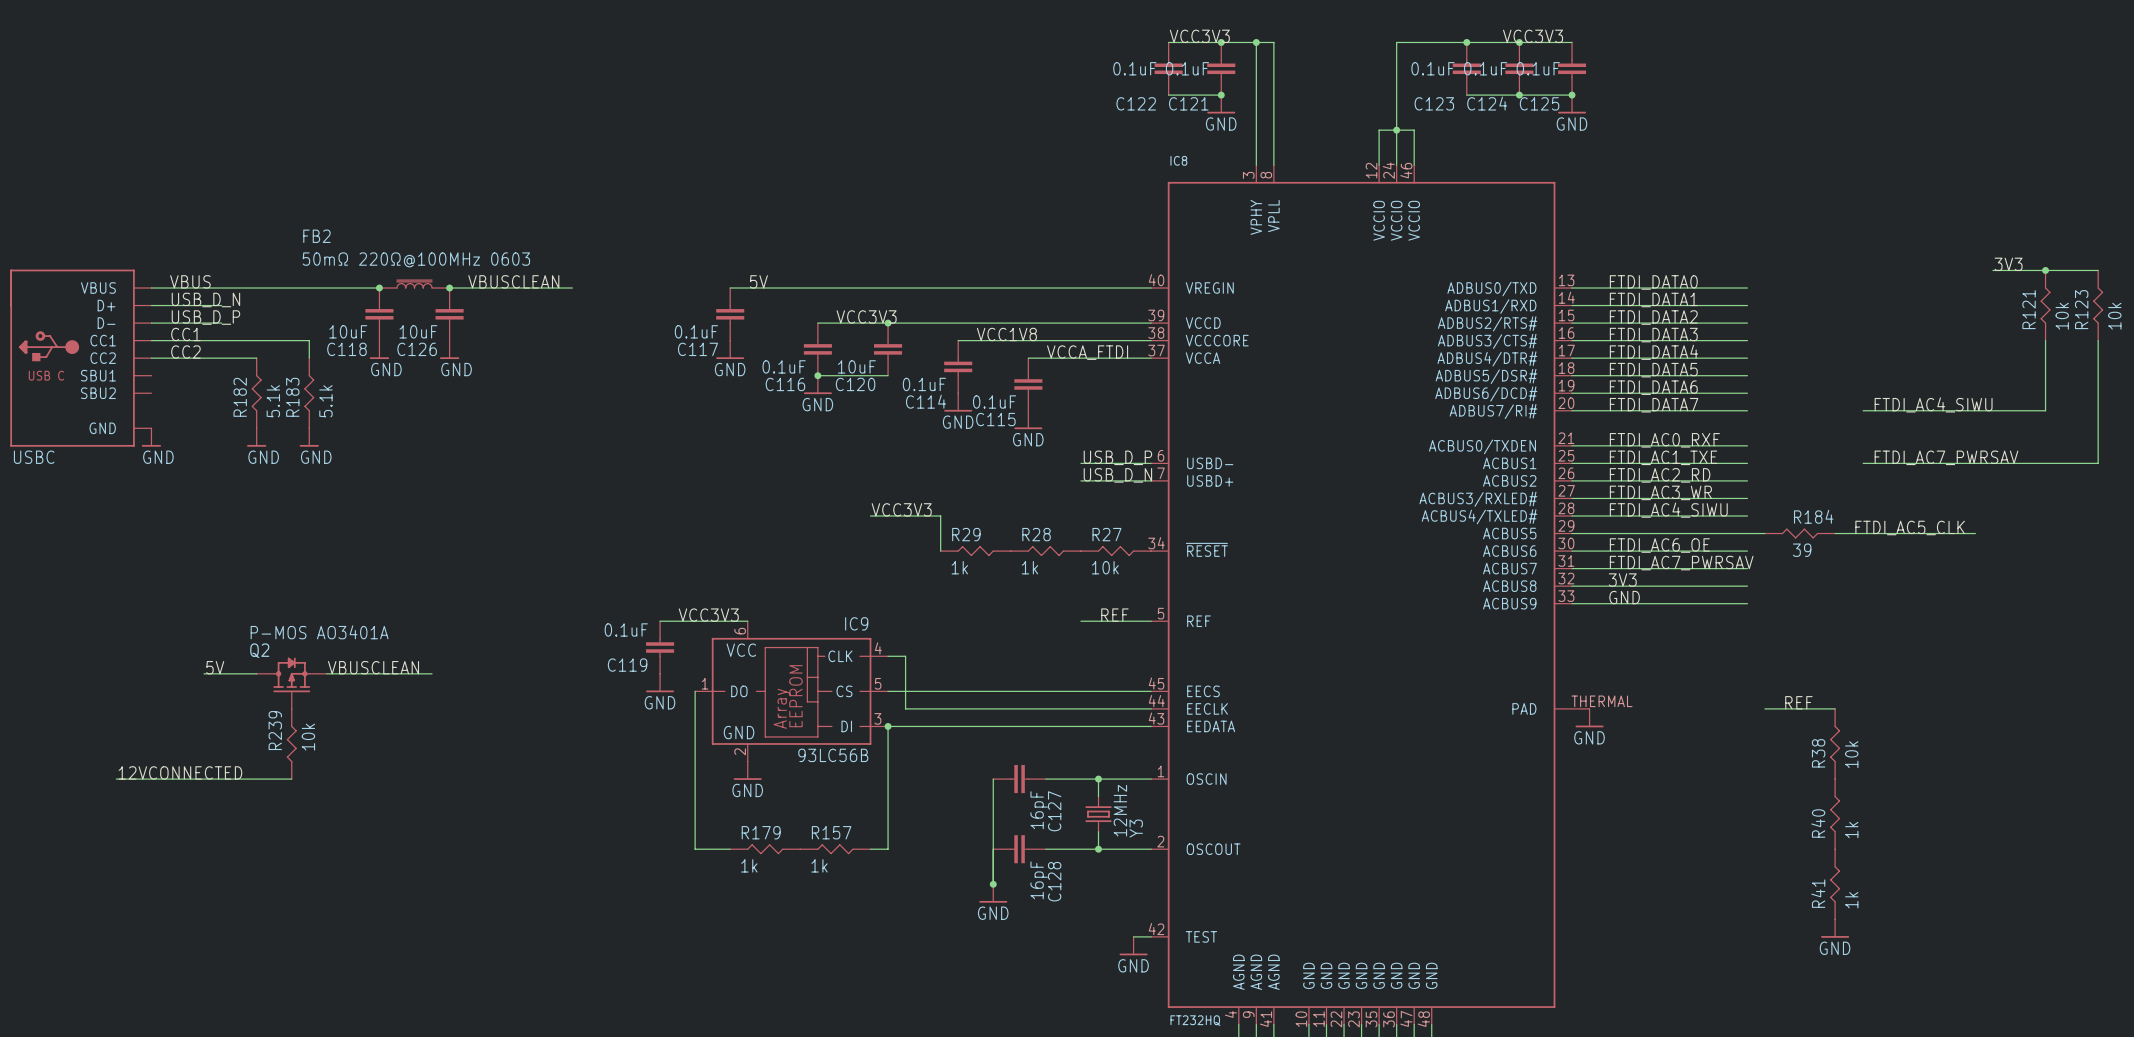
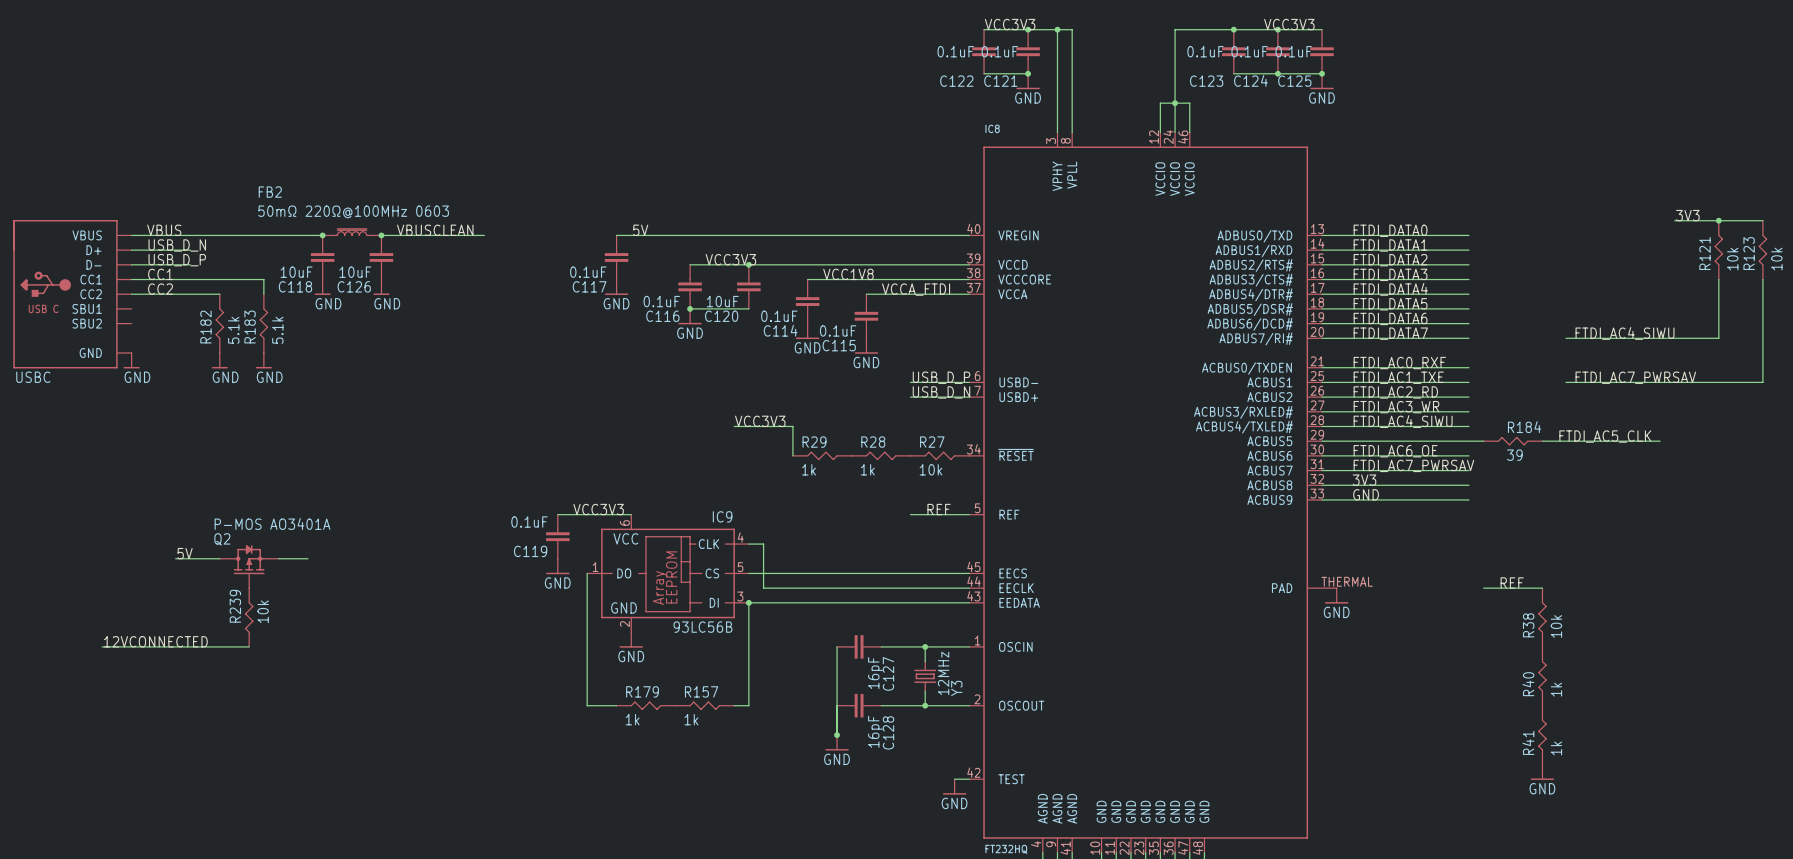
label: VBUSCLEAN (373, 667) -> none
wire: (361, 673) (432, 673) -> none

